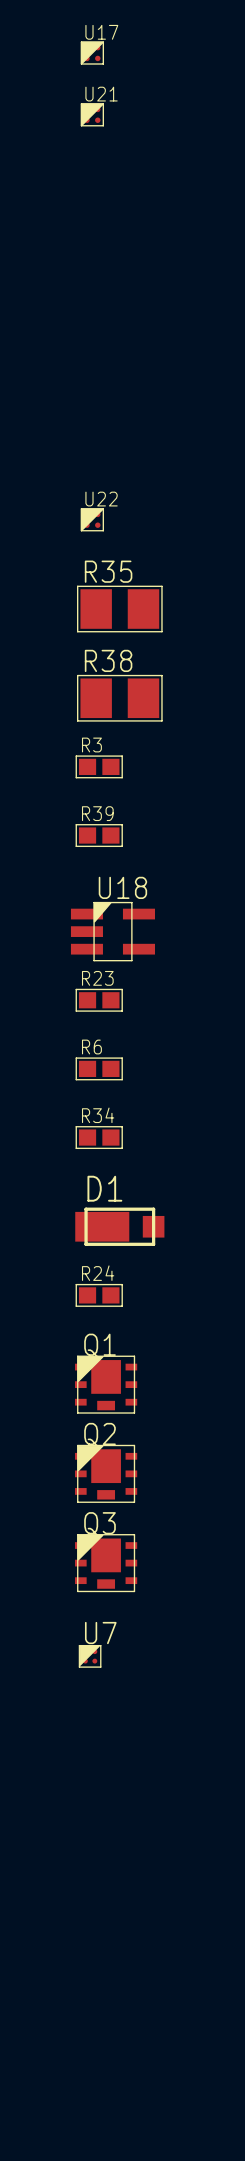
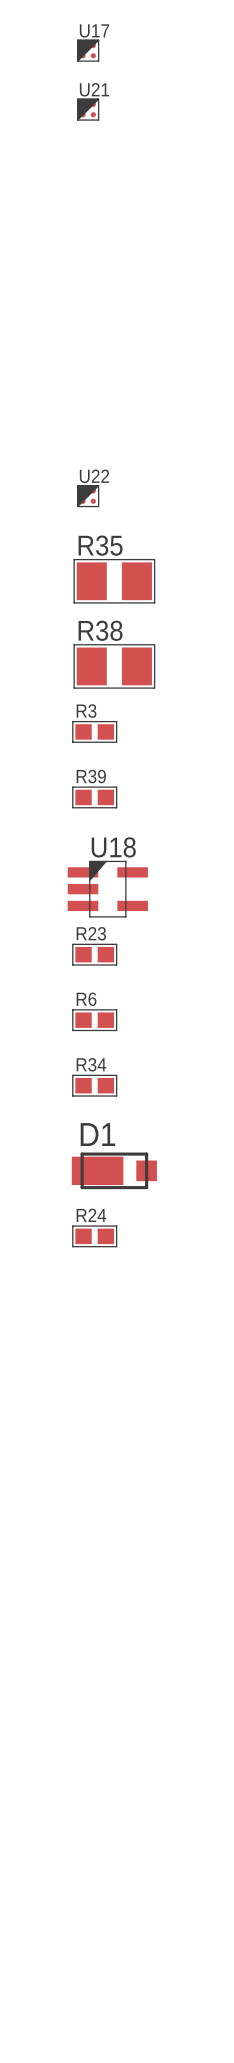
Q1: (106, 1384) -> none
Q2: (106, 1473) -> none
Q3: (106, 1563) -> none
U7: (90, 1656) -> none

